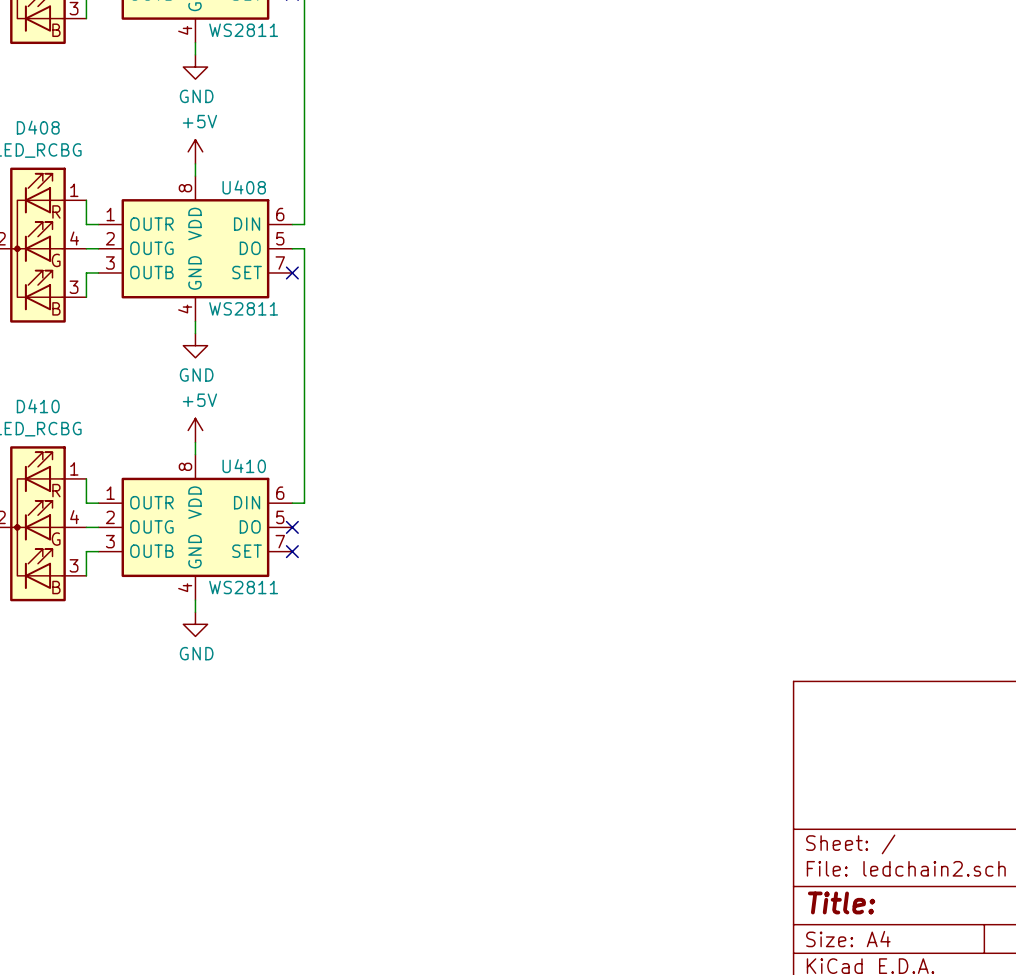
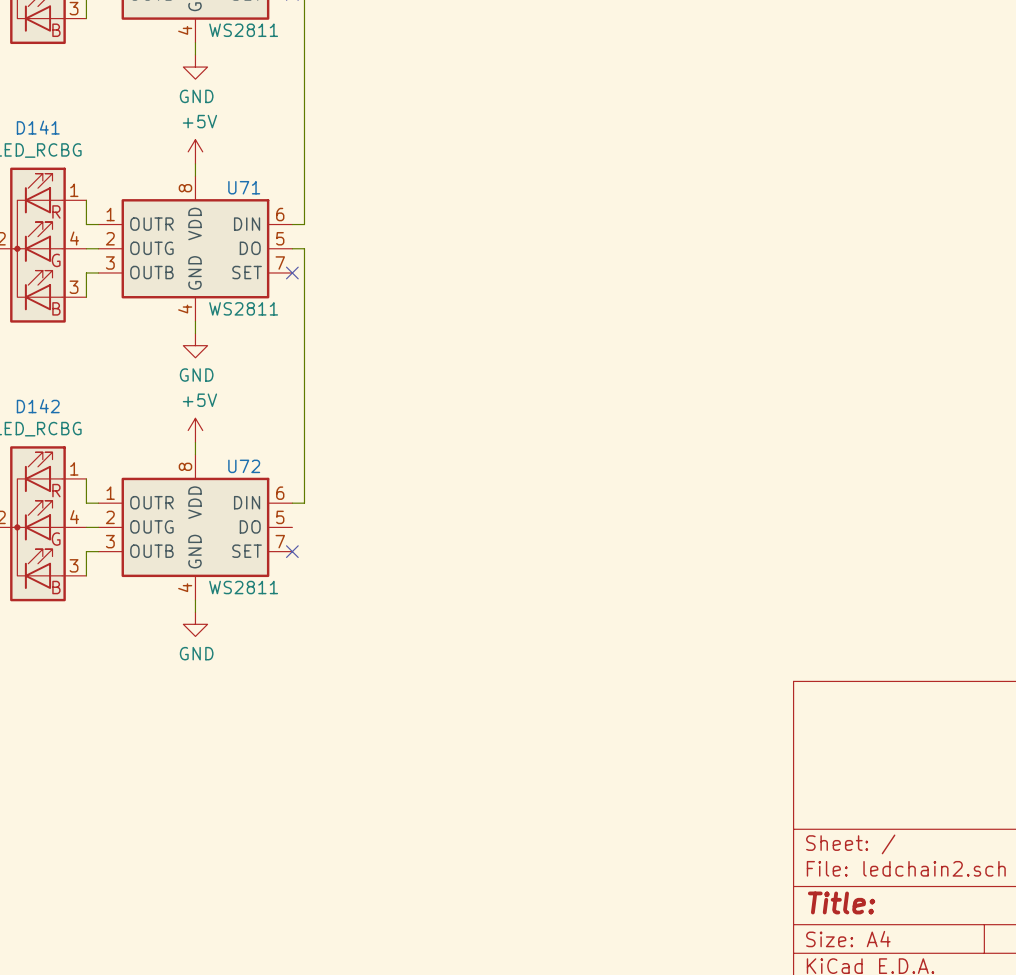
D408 name: D408 (38, 127) -> D141 (38, 127)
U408 name: U408 (244, 187) -> U71 (244, 187)
D410 name: D410 (38, 406) -> D142 (38, 406)
U410 name: U410 (244, 466) -> U72 (244, 466)
no-connect mark: (292, 527) -> none

